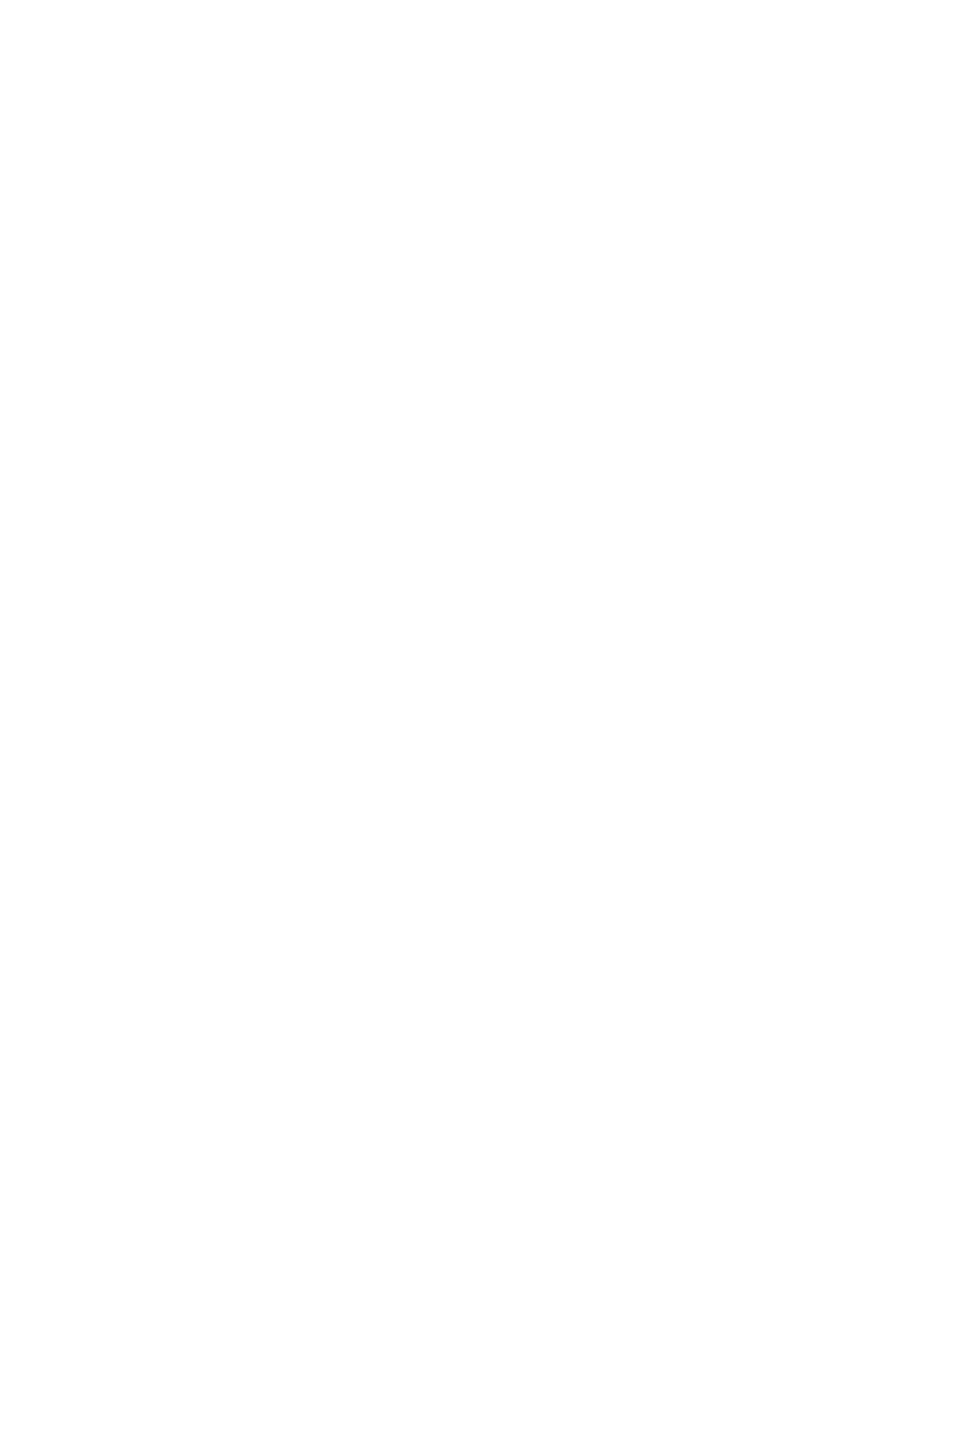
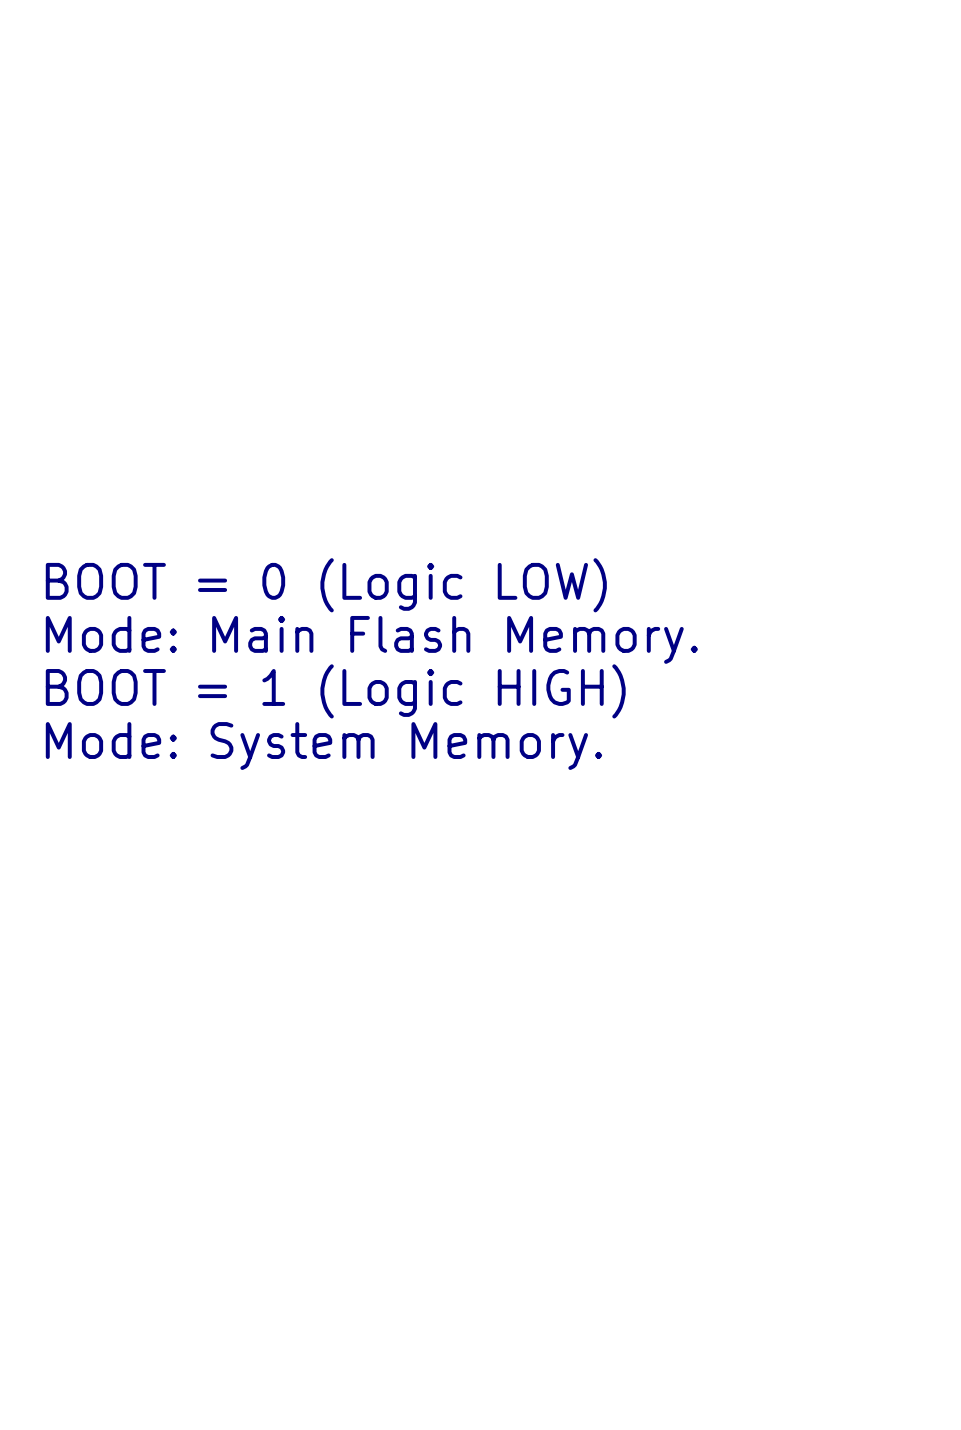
text: none -> BOOT = 0 (Logic LOW) (326, 585)
text: none -> Mode: Main Flash Memory. (371, 639)
text: none -> BOOT = 1 (Logic HIGH) (335, 691)
text: none -> Mode: System Memory. (323, 746)

